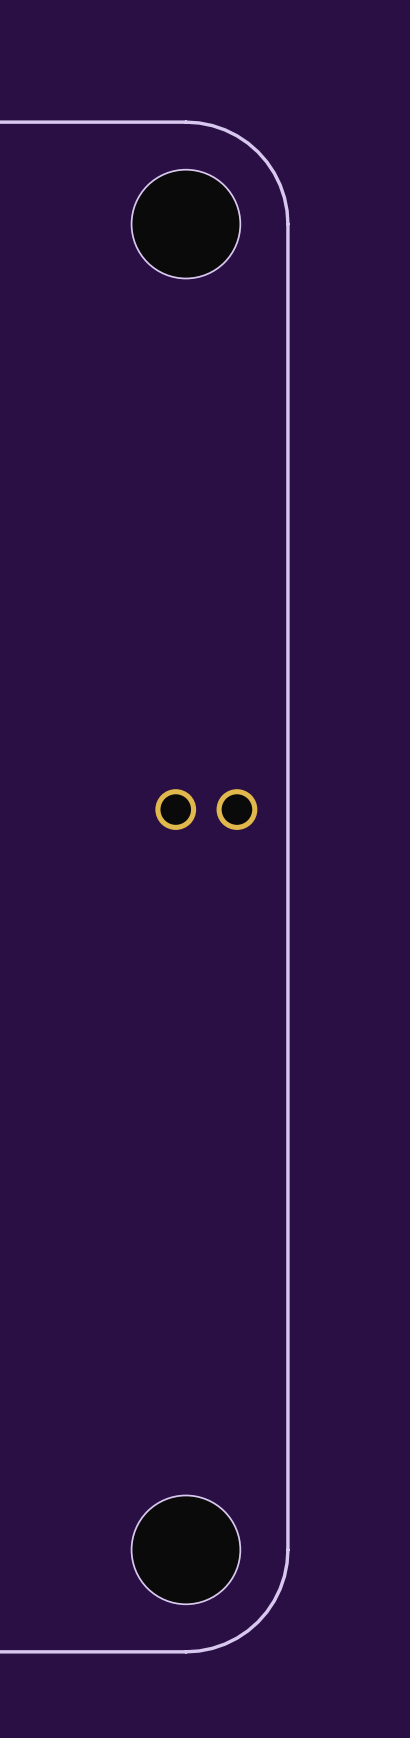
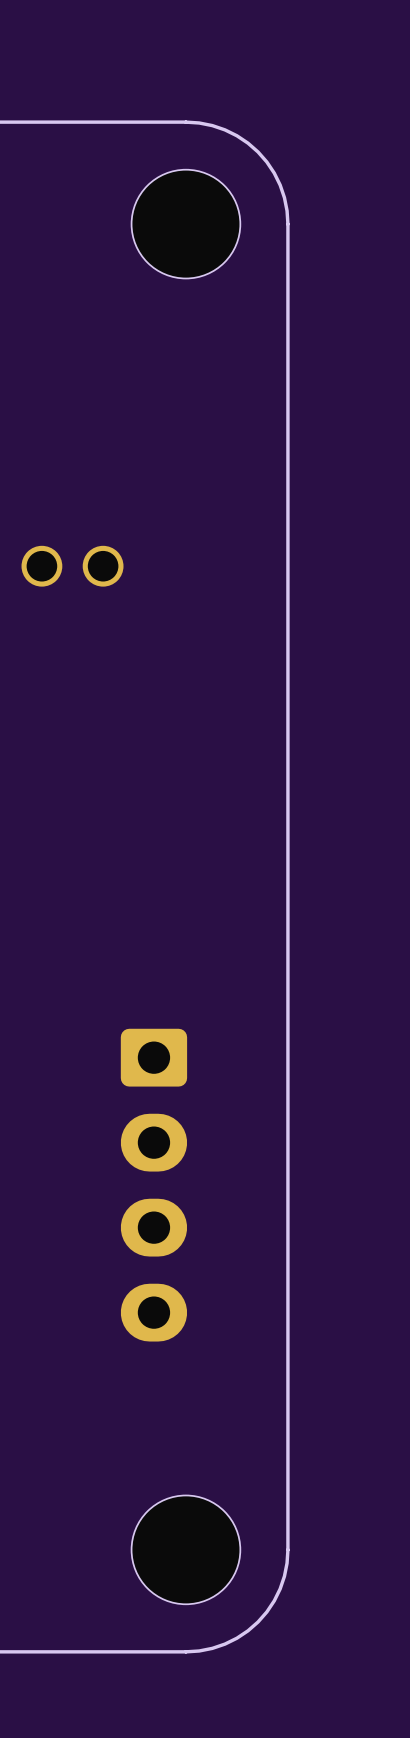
part position: (206, 809) -> (72, 566)
part: none -> (153, 1185)

